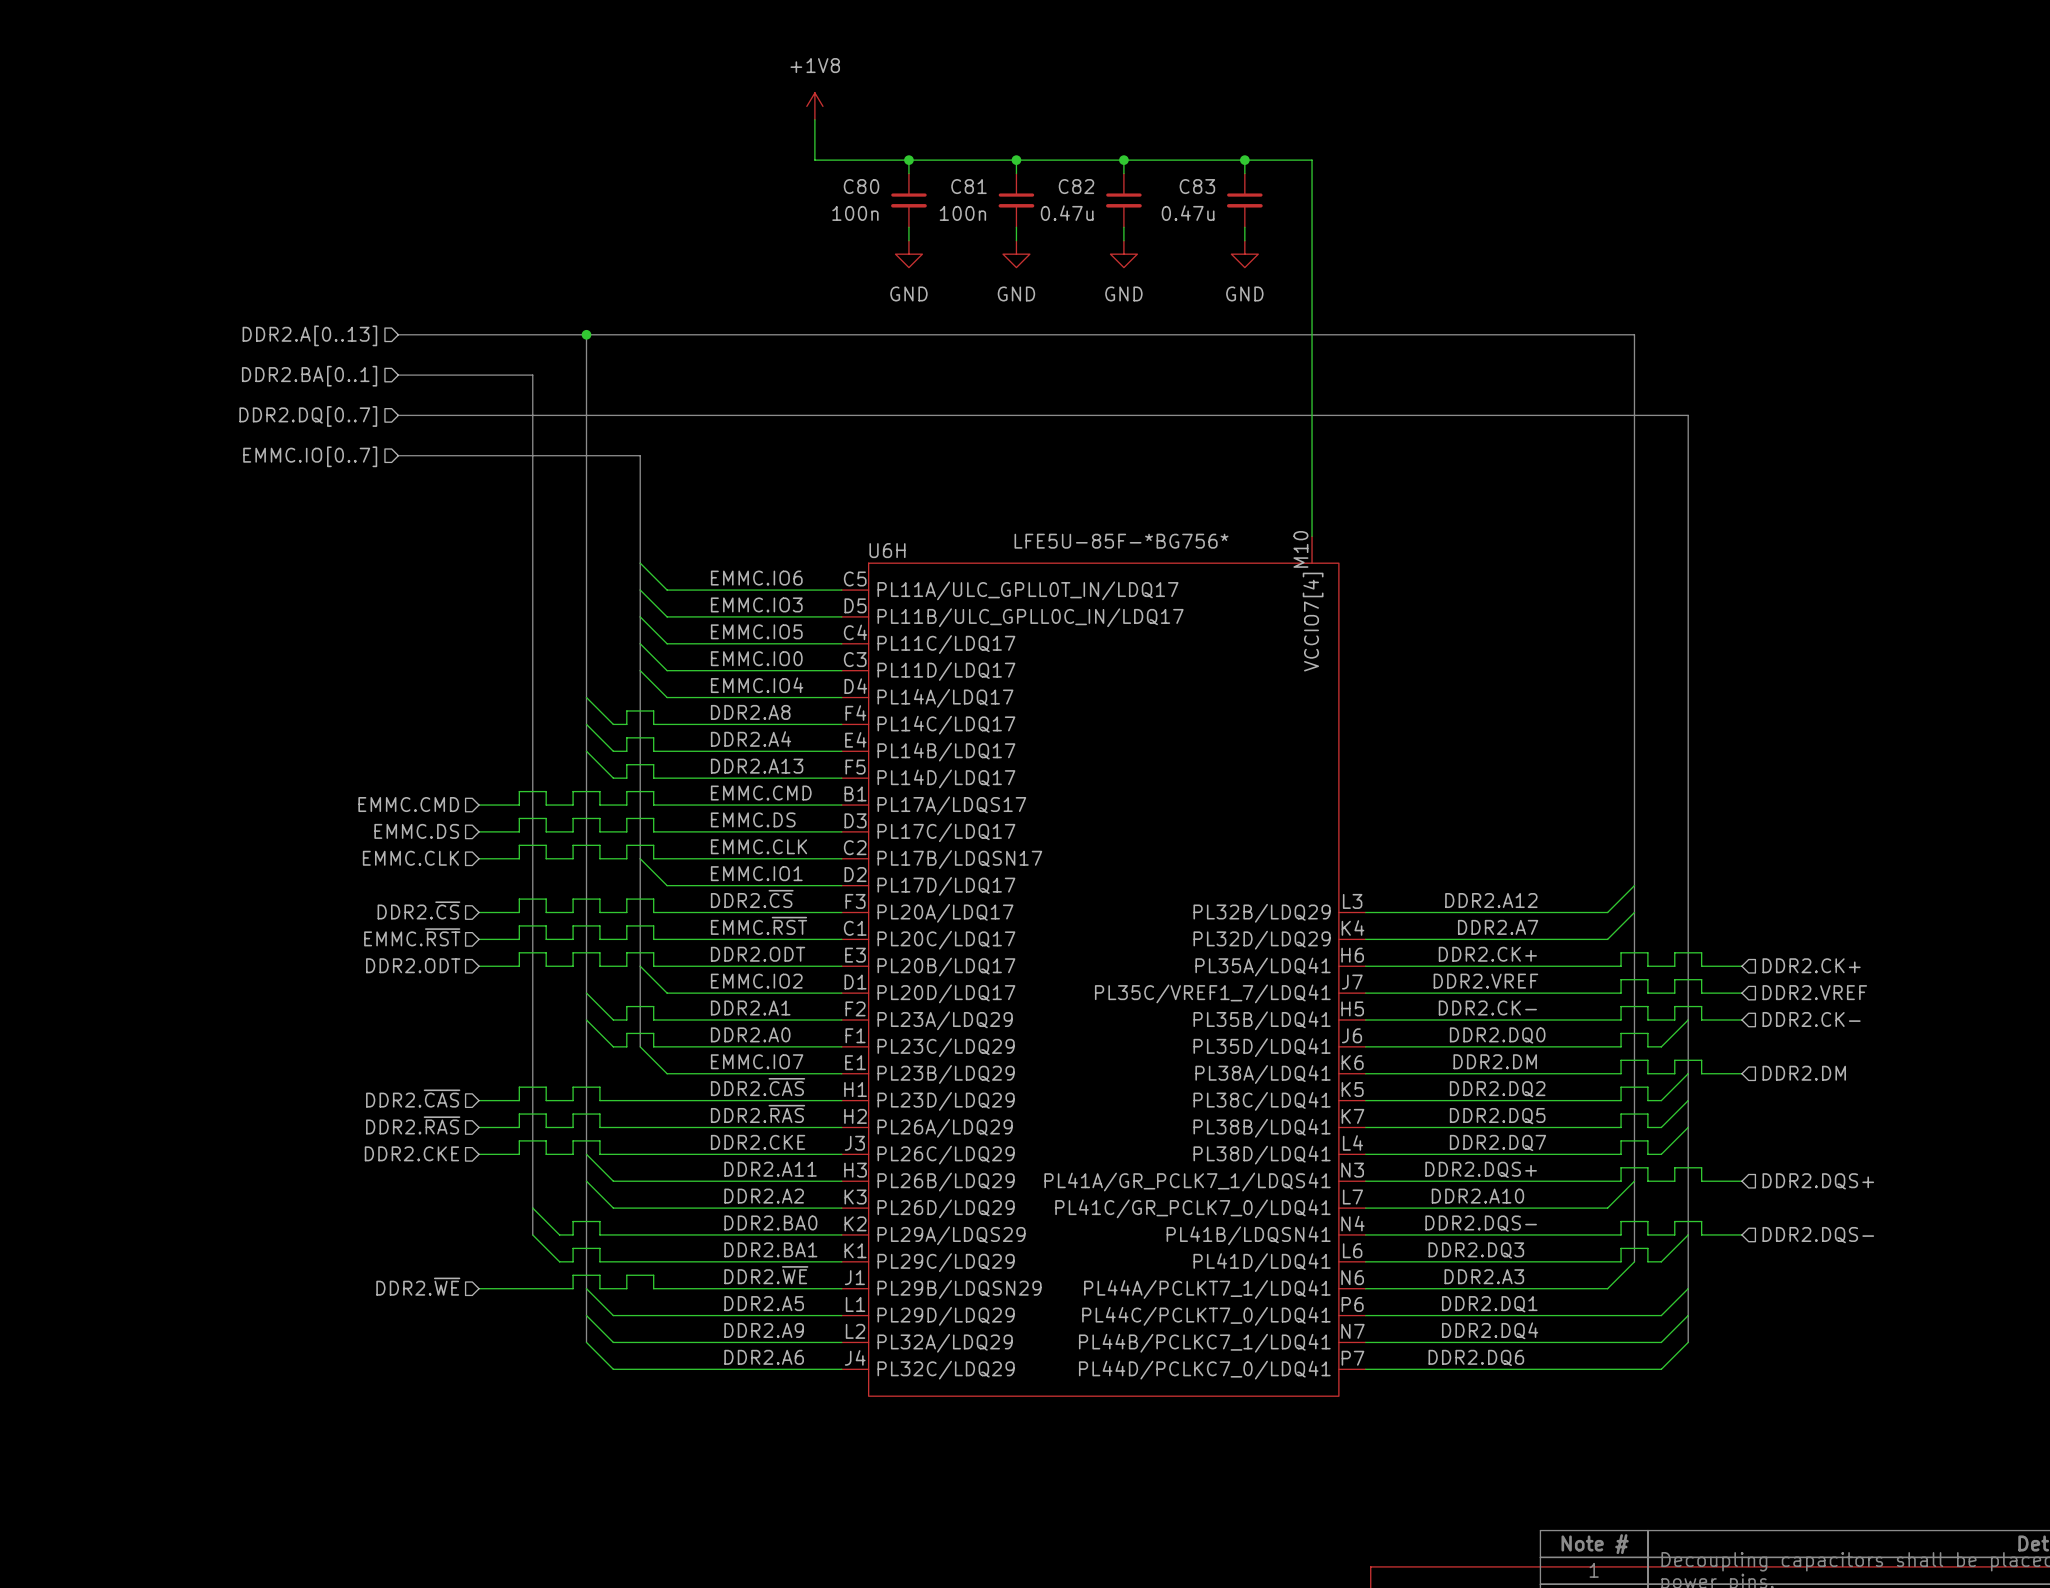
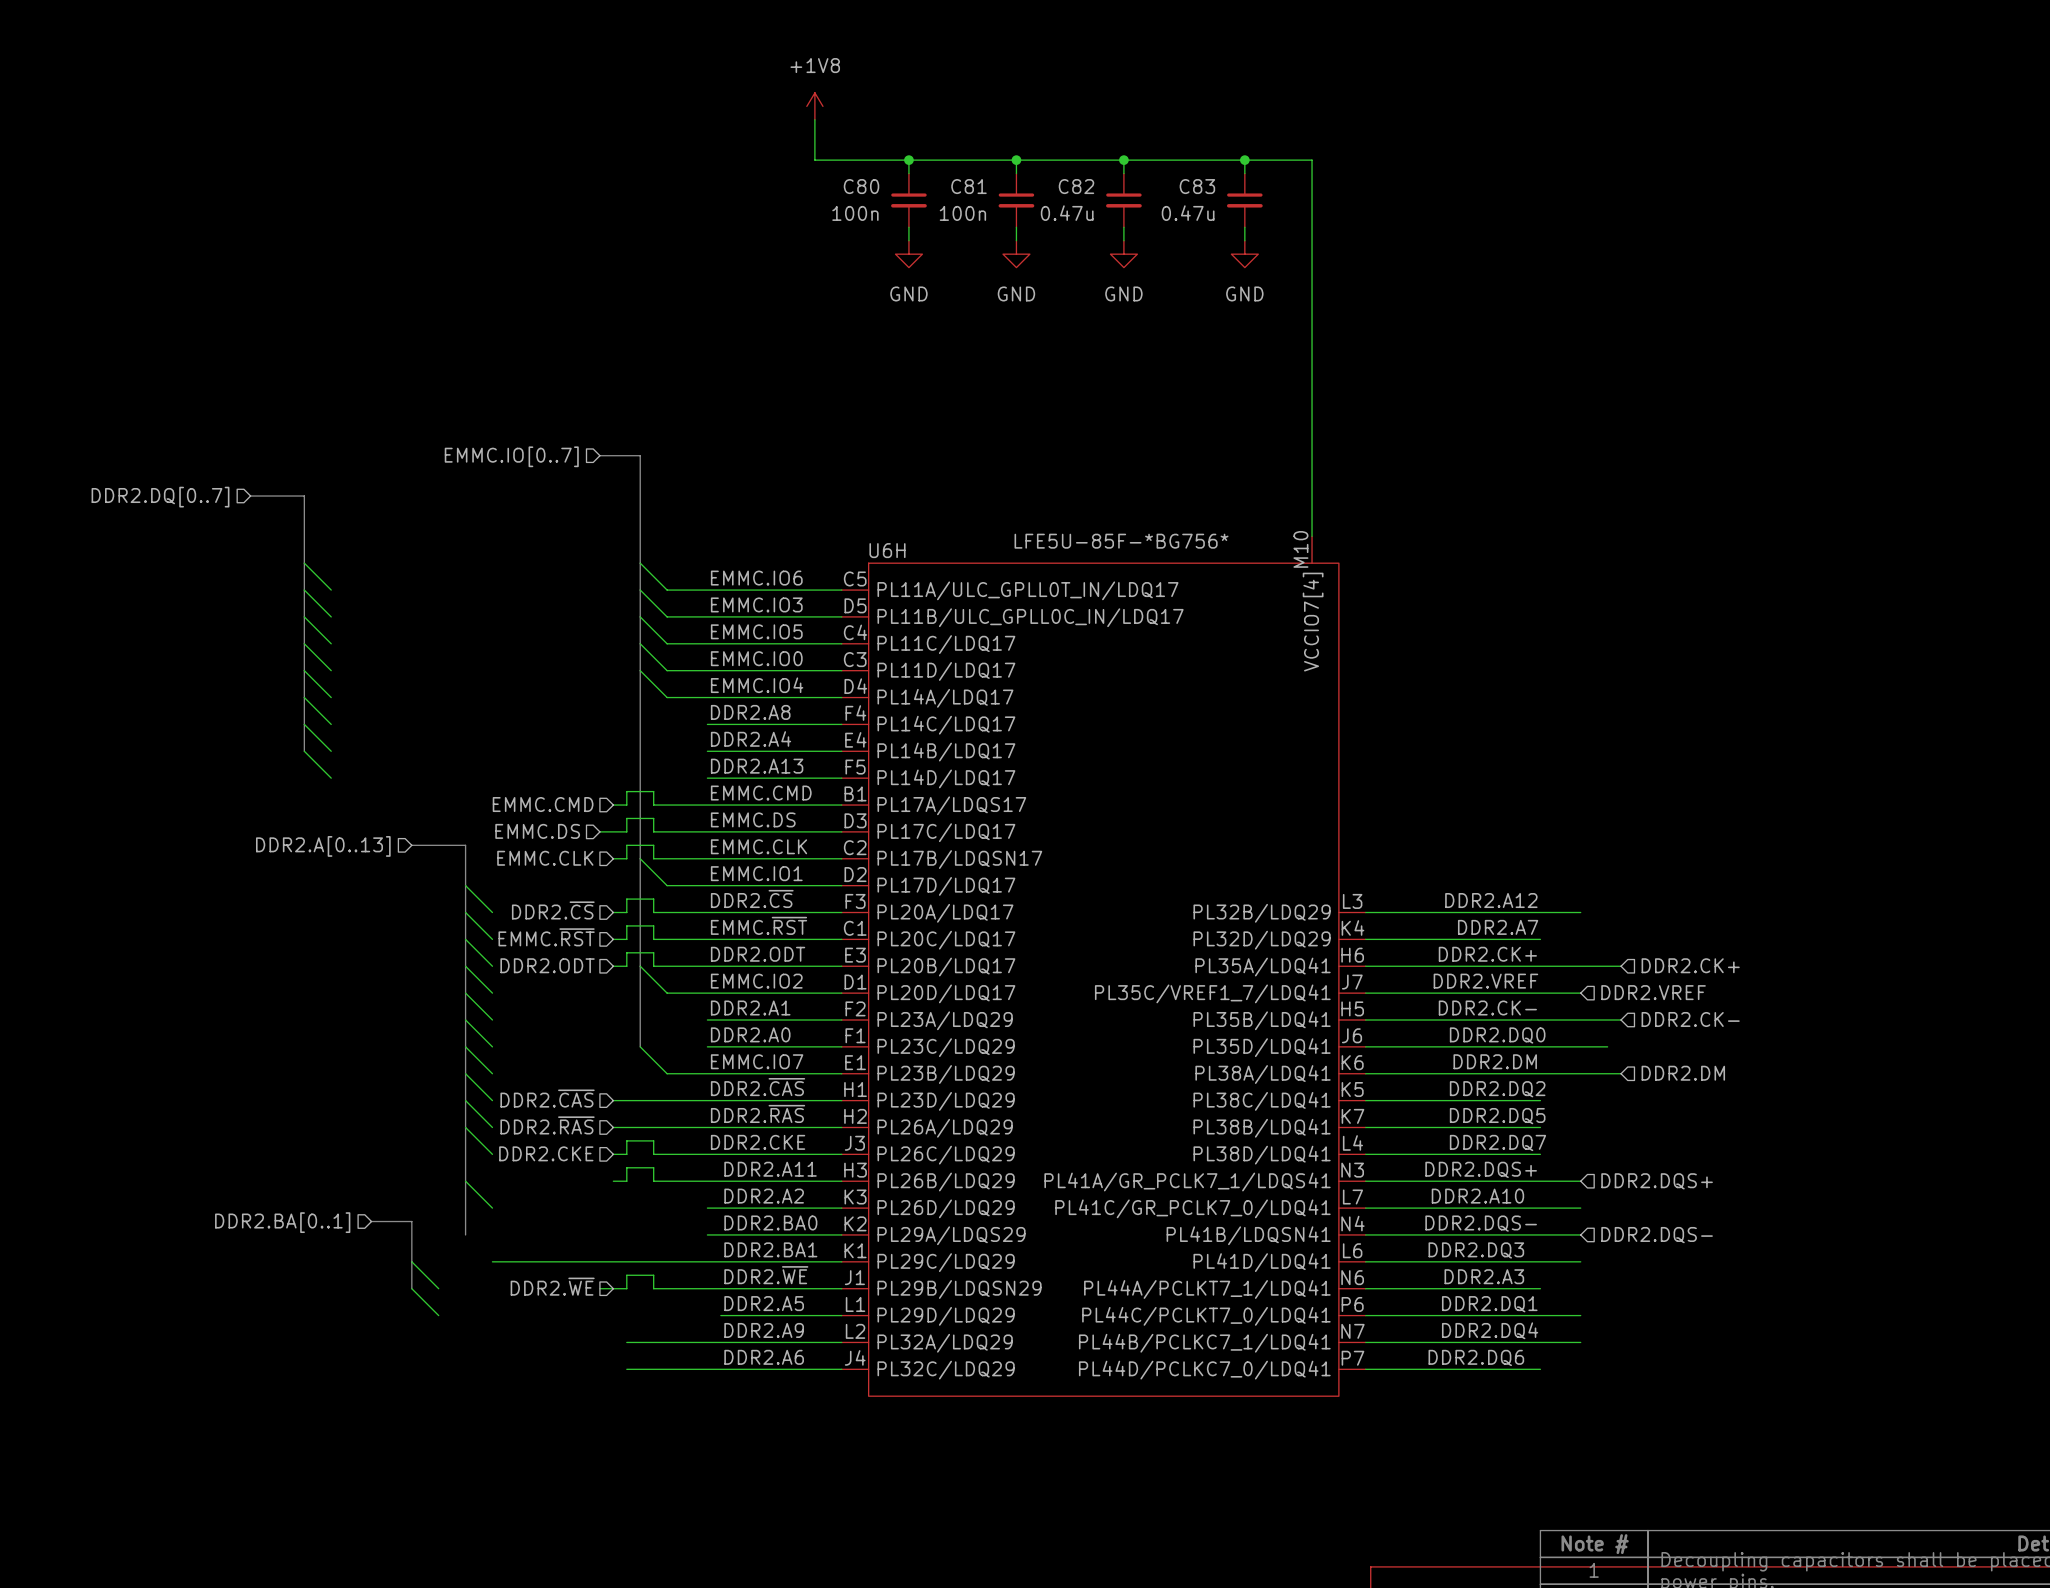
bus: (398, 334) (1634, 334) (1634, 1261) -> none
bus: (586, 334) (586, 1342) -> none
junction: (586, 334) -> none
hierarchical label: DDR2.A[0..13] (309, 335) -> none
bus: (398, 375) (532, 375) (532, 1234) -> none
hierarchical label: DDR2.BA[0..1] (309, 376) -> none
bus: (398, 415) (1688, 415) (1688, 1342) -> none
hierarchical label position: DDR2.DQ[0..7] (308, 416) -> DDR2.DQ[0..7] (160, 497)
bus: (398, 455) (599, 455) -> none
hierarchical label position: EMMC.IO[0..7] (310, 456) -> EMMC.IO[0..7] (511, 456)
bus: none -> (250, 496) (304, 496) (304, 751)
wire: none -> (304, 563) (331, 590)
wire: none -> (304, 590) (331, 616)
wire: none -> (304, 616) (331, 643)
wire: none -> (304, 643) (331, 670)
wire: none -> (304, 670) (331, 697)
wire: none -> (304, 697) (331, 724)
wire: (586, 697) (613, 724) (626, 724) (626, 710) (653, 710) (653, 724) (707, 724) -> none
wire: none -> (304, 724) (331, 751)
wire: (586, 724) (613, 751) (626, 751) (626, 737) (653, 737) (653, 751) (707, 751) -> none
wire: none -> (304, 751) (331, 778)
wire: (586, 751) (613, 778) (626, 778) (626, 764) (653, 764) (653, 778) (707, 778) -> none
hierarchical label position: EMMC.CMD (408, 804) -> EMMC.CMD (543, 804)
wire: (479, 805) (519, 805) (519, 791) (546, 791) (546, 805) (573, 805) (573, 791) (599, 791) (599, 805) (613, 805) -> none
hierarchical label position: EMMC.DS (416, 831) -> EMMC.DS (537, 831)
wire: (479, 831) (519, 831) (519, 818) (546, 818) (546, 831) (573, 831) (573, 818) (599, 818) (599, 831) -> none
bus: none -> (411, 845) (465, 845) (465, 1234)
hierarchical label: none -> DDR2.A[0..13] (323, 846)
hierarchical label position: EMMC.CLK (410, 858) -> EMMC.CLK (545, 858)
wire: (479, 858) (519, 858) (519, 845) (546, 845) (546, 858) (573, 858) (573, 845) (599, 845) (599, 858) (613, 858) -> none
wire: none -> (465, 885) (492, 912)
wire: (1634, 885) (1607, 912) (1580, 912) -> none
hierarchical label position: DDR2.~{CS} (418, 910) -> DDR2.~{CS} (553, 910)
wire: none -> (465, 912) (492, 939)
wire: (479, 912) (519, 912) (519, 899) (546, 899) (546, 912) (573, 912) (573, 899) (599, 899) (599, 912) (613, 912) -> none
wire: (1634, 912) (1607, 939) (1540, 939) -> none
hierarchical label position: EMMC.~{RST} (412, 937) -> EMMC.~{RST} (546, 937)
wire: none -> (465, 939) (492, 966)
wire: (479, 939) (519, 939) (519, 925) (546, 925) (546, 939) (573, 939) (573, 925) (599, 925) (599, 939) (613, 939) -> none
hierarchical label position: DDR2.ODT (413, 965) -> DDR2.ODT (547, 965)
hierarchical label position: DDR2.CK+ (1811, 965) -> DDR2.CK+ (1690, 965)
wire: none -> (465, 966) (492, 993)
wire: (479, 966) (519, 966) (519, 952) (546, 952) (546, 966) (573, 966) (573, 952) (599, 952) (599, 966) (613, 966) -> none
wire: (1621, 966) (1621, 952) (1647, 952) (1647, 966) (1674, 966) (1674, 952) (1701, 952) (1701, 966) (1741, 966) -> none
hierarchical label position: DDR2.VREF (1814, 992) -> DDR2.VREF (1653, 992)
wire: none -> (465, 993) (492, 1019)
wire: (586, 993) (613, 1019) (626, 1019) (626, 1006) (653, 1006) (653, 1019) (707, 1019) -> none
wire: (1580, 993) (1621, 993) (1621, 979) (1647, 979) (1647, 993) (1674, 993) (1674, 979) (1701, 979) (1701, 993) (1741, 993) -> none
wire: none -> (465, 1019) (492, 1046)
wire: (586, 1019) (613, 1046) (626, 1046) (626, 1033) (653, 1033) (653, 1046) (707, 1046) -> none
wire: (1621, 1019) (1621, 1006) (1647, 1006) (1647, 1019) (1674, 1019) (1674, 1006) (1701, 1006) (1701, 1019) (1741, 1019) -> none
wire: (1688, 1019) (1661, 1046) (1647, 1046) (1647, 1033) (1621, 1033) (1621, 1046) (1607, 1046) -> none
hierarchical label position: DDR2.CK- (1811, 1019) -> DDR2.CK- (1690, 1019)
wire: none -> (465, 1046) (492, 1073)
wire: none -> (465, 1073) (492, 1100)
wire: (1621, 1073) (1621, 1060) (1647, 1060) (1647, 1073) (1674, 1073) (1674, 1060) (1701, 1060) (1701, 1073) (1741, 1073) -> none
wire: (1688, 1073) (1661, 1100) (1647, 1100) (1647, 1087) (1621, 1087) (1621, 1100) (1540, 1100) -> none
hierarchical label position: DDR2.DM (1804, 1073) -> DDR2.DM (1683, 1073)
hierarchical label position: DDR2.~{CAS} (413, 1098) -> DDR2.~{CAS} (547, 1098)
wire: none -> (465, 1100) (492, 1127)
wire: (479, 1100) (519, 1100) (519, 1087) (546, 1087) (546, 1100) (573, 1100) (573, 1087) (599, 1087) (599, 1100) (613, 1100) -> none
wire: (1688, 1100) (1661, 1127) (1647, 1127) (1647, 1114) (1621, 1114) (1621, 1127) (1540, 1127) -> none
hierarchical label position: DDR2.~{RAS} (413, 1125) -> DDR2.~{RAS} (547, 1125)
wire: none -> (465, 1127) (492, 1154)
wire: (479, 1127) (519, 1127) (519, 1114) (546, 1114) (546, 1127) (573, 1127) (573, 1114) (599, 1114) (599, 1127) (613, 1127) -> none
wire: (1688, 1127) (1661, 1154) (1647, 1154) (1647, 1140) (1621, 1140) (1621, 1154) (1540, 1154) -> none
hierarchical label position: DDR2.CKE (411, 1153) -> DDR2.CKE (546, 1153)
wire: (479, 1154) (519, 1154) (519, 1140) (546, 1140) (546, 1154) (573, 1154) (573, 1140) (599, 1140) (599, 1154) (613, 1154) -> none
wire: (586, 1154) (613, 1181) -> (465, 1181) (492, 1208)
wire: (626, 1154) (653, 1154) -> (626, 1154) (626, 1140) (653, 1140) (653, 1154)
wire: (586, 1181) (613, 1208) (707, 1208) -> none
wire: (626, 1181) (653, 1181) -> (626, 1181) (626, 1167) (653, 1167) (653, 1181)
wire: (1580, 1181) (1621, 1181) (1621, 1167) (1647, 1167) (1647, 1181) (1674, 1181) (1674, 1167) (1701, 1167) (1701, 1181) (1741, 1181) -> none
wire: (1634, 1181) (1607, 1208) (1580, 1208) -> none
hierarchical label position: DDR2.DQS+ (1818, 1181) -> DDR2.DQS+ (1657, 1181)
wire: (532, 1208) (559, 1234) (573, 1234) (573, 1221) (599, 1221) (599, 1234) (707, 1234) -> none
bus: none -> (371, 1221) (411, 1221) (411, 1288)
hierarchical label: none -> DDR2.BA[0..1] (282, 1222)
wire: (532, 1234) (559, 1261) -> (492, 1261) (559, 1261)
wire: (1580, 1234) (1621, 1234) (1621, 1221) (1647, 1221) (1647, 1234) (1674, 1234) (1674, 1221) (1701, 1221) (1701, 1234) (1741, 1234) -> none
wire: (1688, 1234) (1661, 1261) (1647, 1261) (1647, 1248) (1621, 1248) (1621, 1261) (1580, 1261) -> none
hierarchical label position: DDR2.DQS- (1818, 1235) -> DDR2.DQS- (1657, 1235)
wire: none -> (411, 1261) (438, 1288)
wire: (573, 1261) (573, 1248) (599, 1248) (599, 1261) -> (573, 1261) (599, 1261)
wire: (1634, 1261) (1607, 1288) (1540, 1288) -> none
hierarchical label position: DDR2.~{WE} (418, 1286) -> DDR2.~{WE} (552, 1286)
wire: none -> (411, 1288) (438, 1315)
wire: (479, 1288) (573, 1288) (573, 1275) (599, 1275) (599, 1288) -> none
wire: (586, 1288) (613, 1315) (720, 1315) -> none
wire: (1688, 1288) (1661, 1315) (1580, 1315) -> none
wire: (586, 1315) (613, 1342) (626, 1342) -> none
wire: (1688, 1315) (1661, 1342) (1580, 1342) -> none
wire: (586, 1342) (613, 1369) (626, 1369) -> none
wire: (1688, 1342) (1661, 1369) (1540, 1369) -> none

